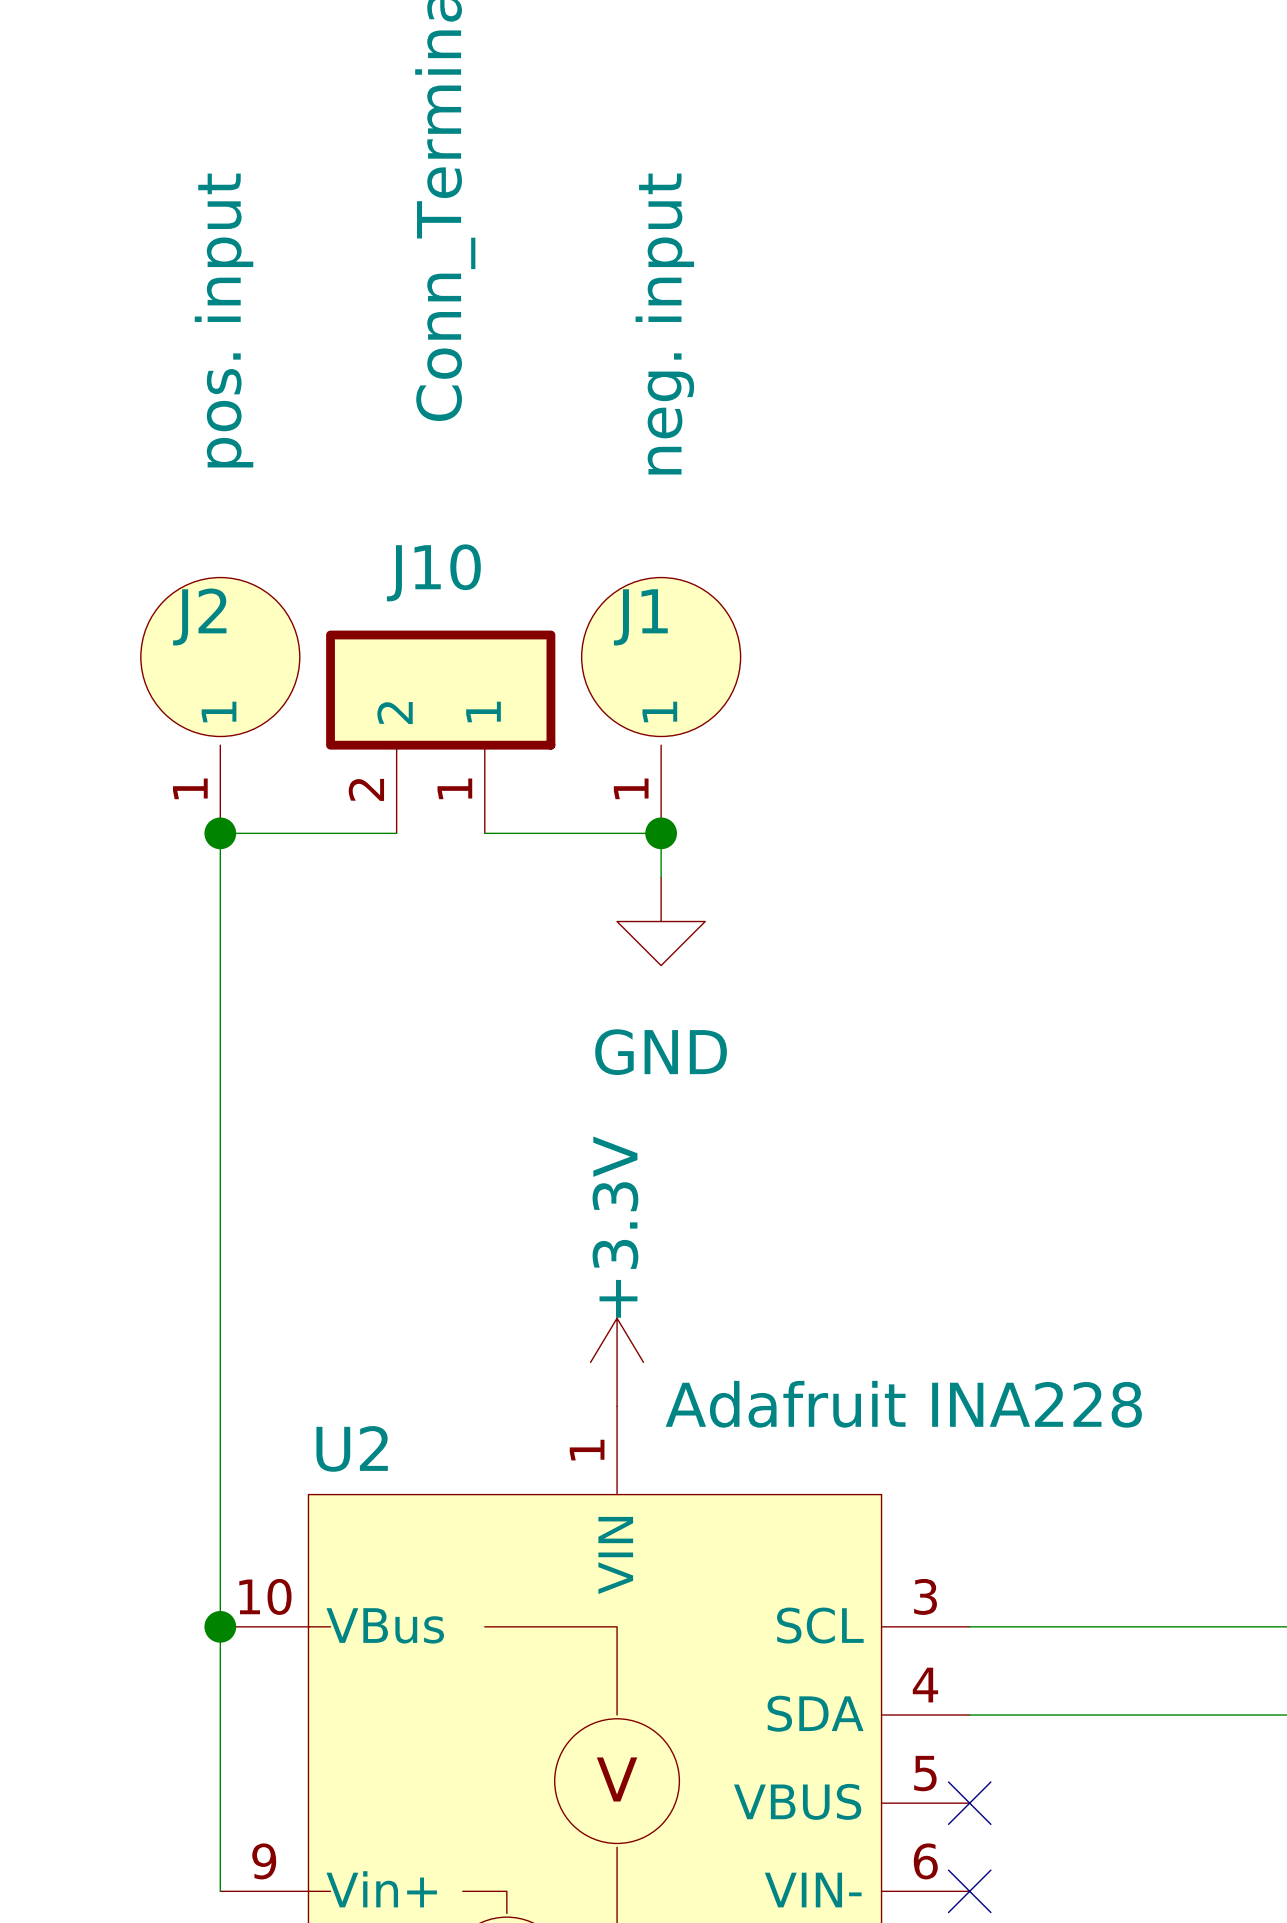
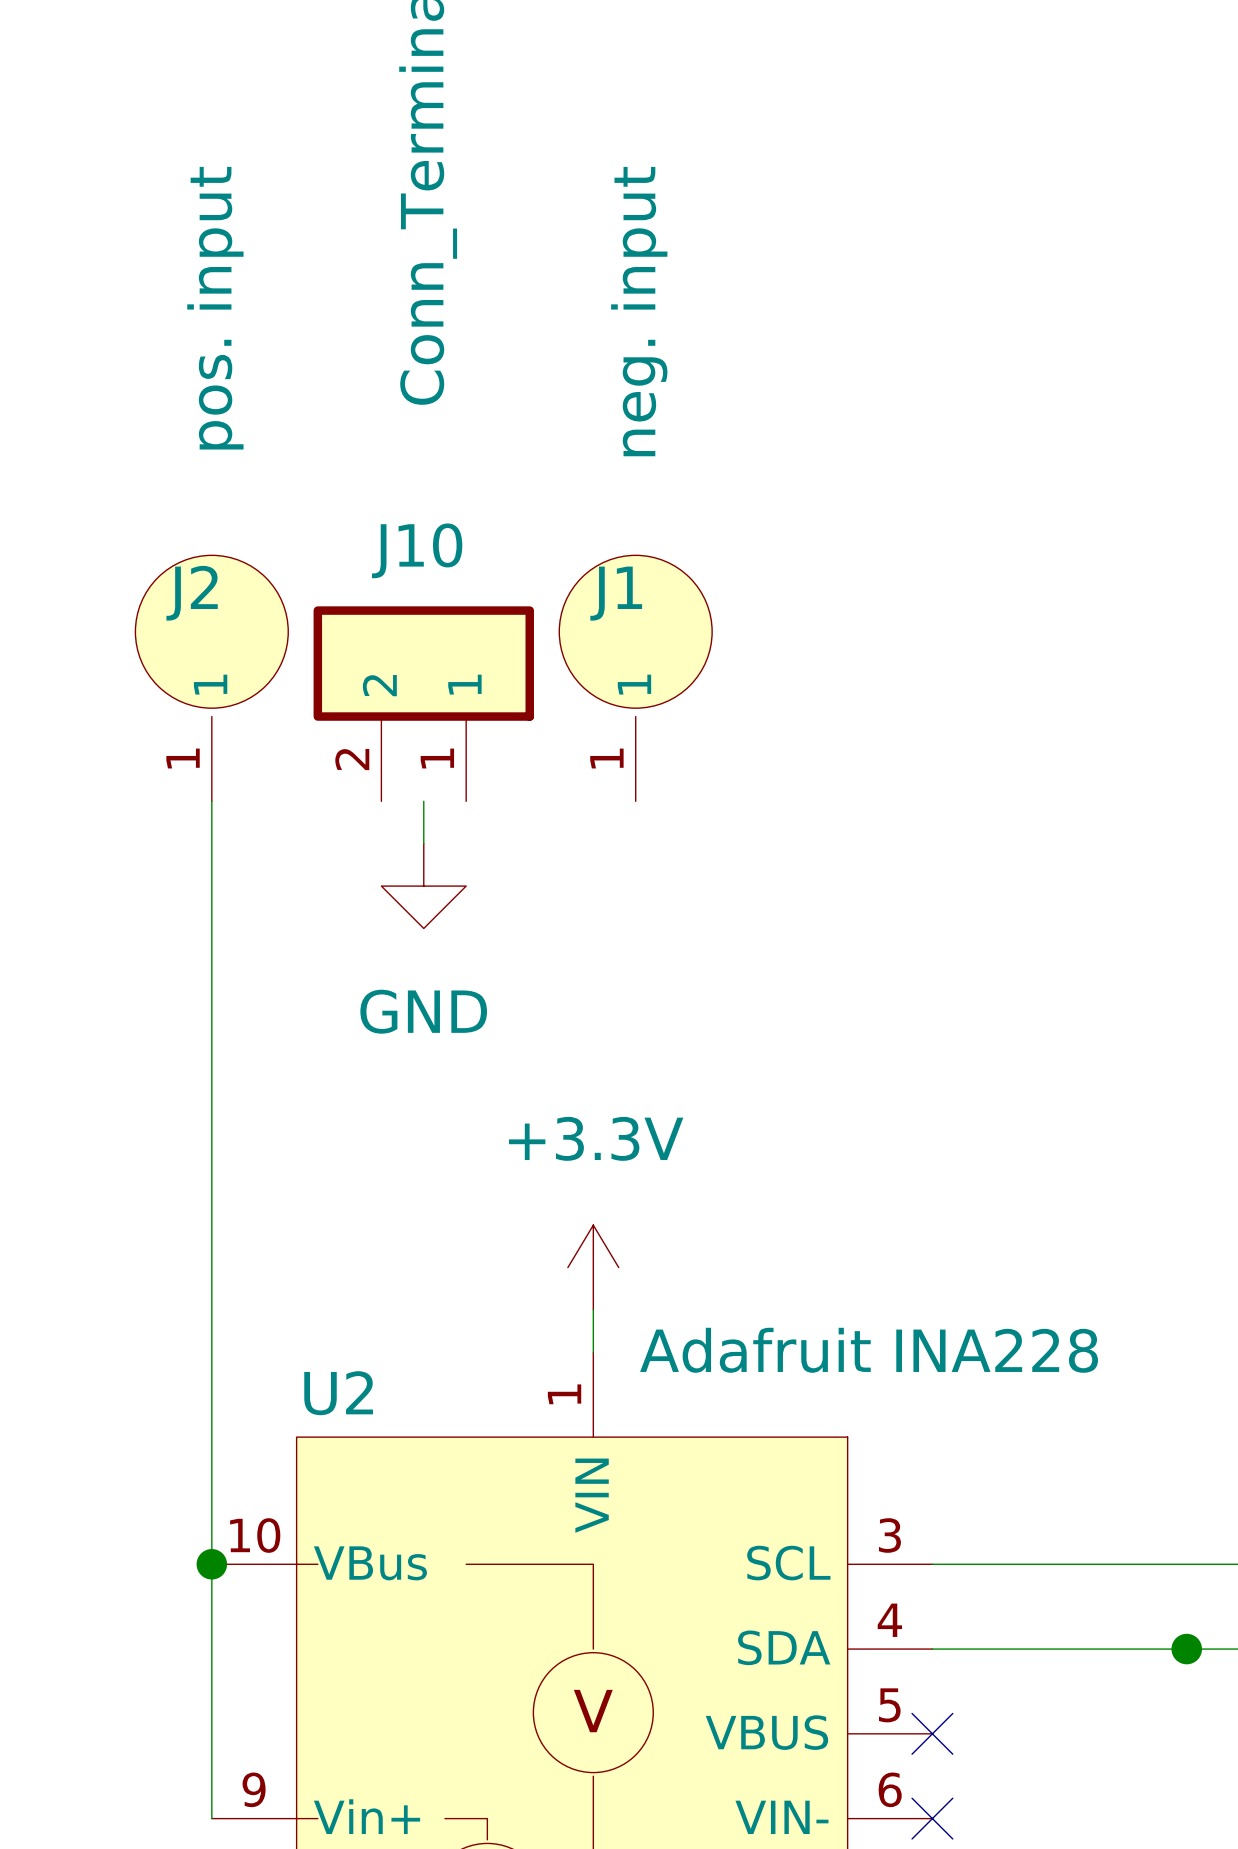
wire: (220, 833) (396, 833) -> none
junction: (220, 833) -> none
wire: none -> (423, 801) (423, 843)
wire: (484, 833) (661, 833) (661, 877) -> none
junction: (661, 833) -> none
power symbol position: GND (661, 921) -> GND (423, 886)
power symbol text rotation: 0° (615, 1227) -> 90° clockwise (596, 1138)
power symbol position: +3.3V (617, 1362) -> +3.3V (593, 1267)
junction: none -> (1186, 1649)

